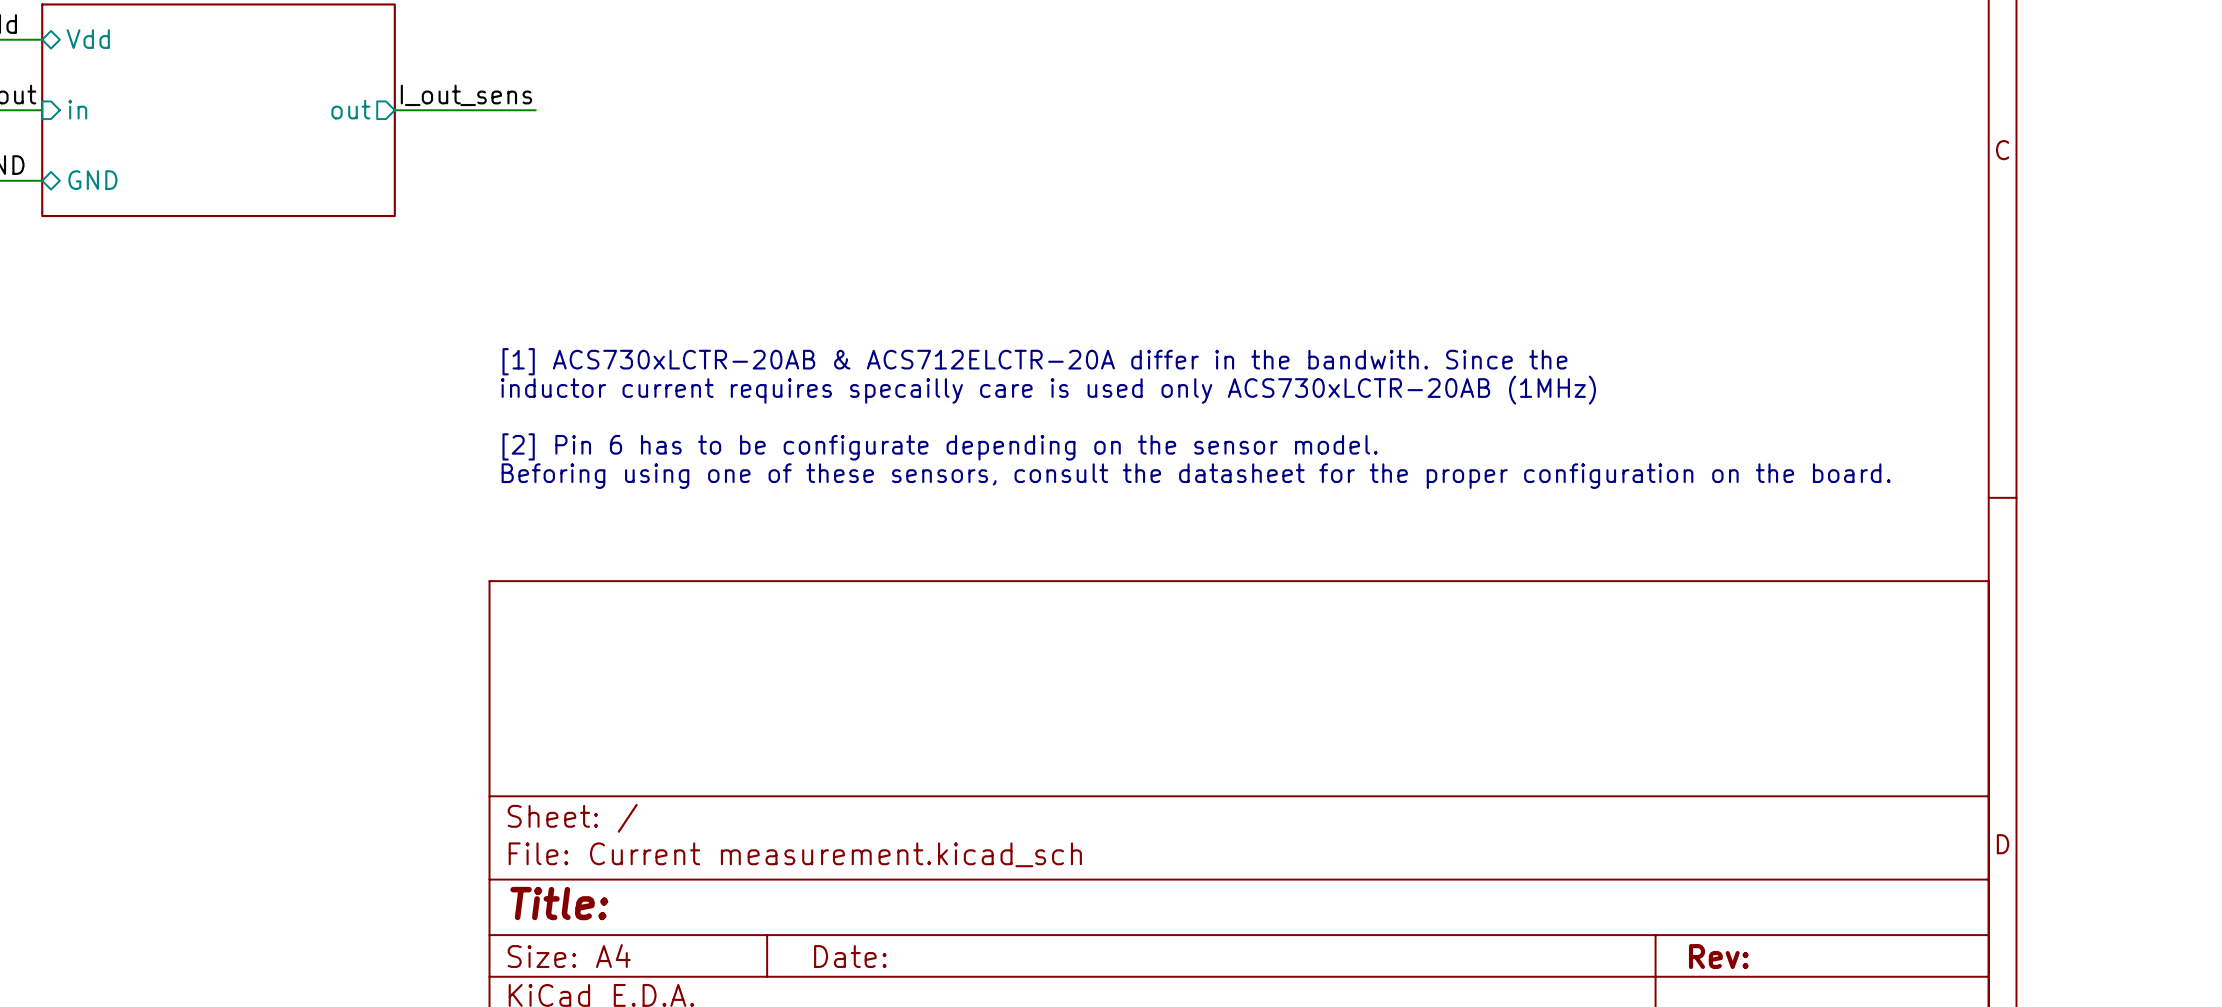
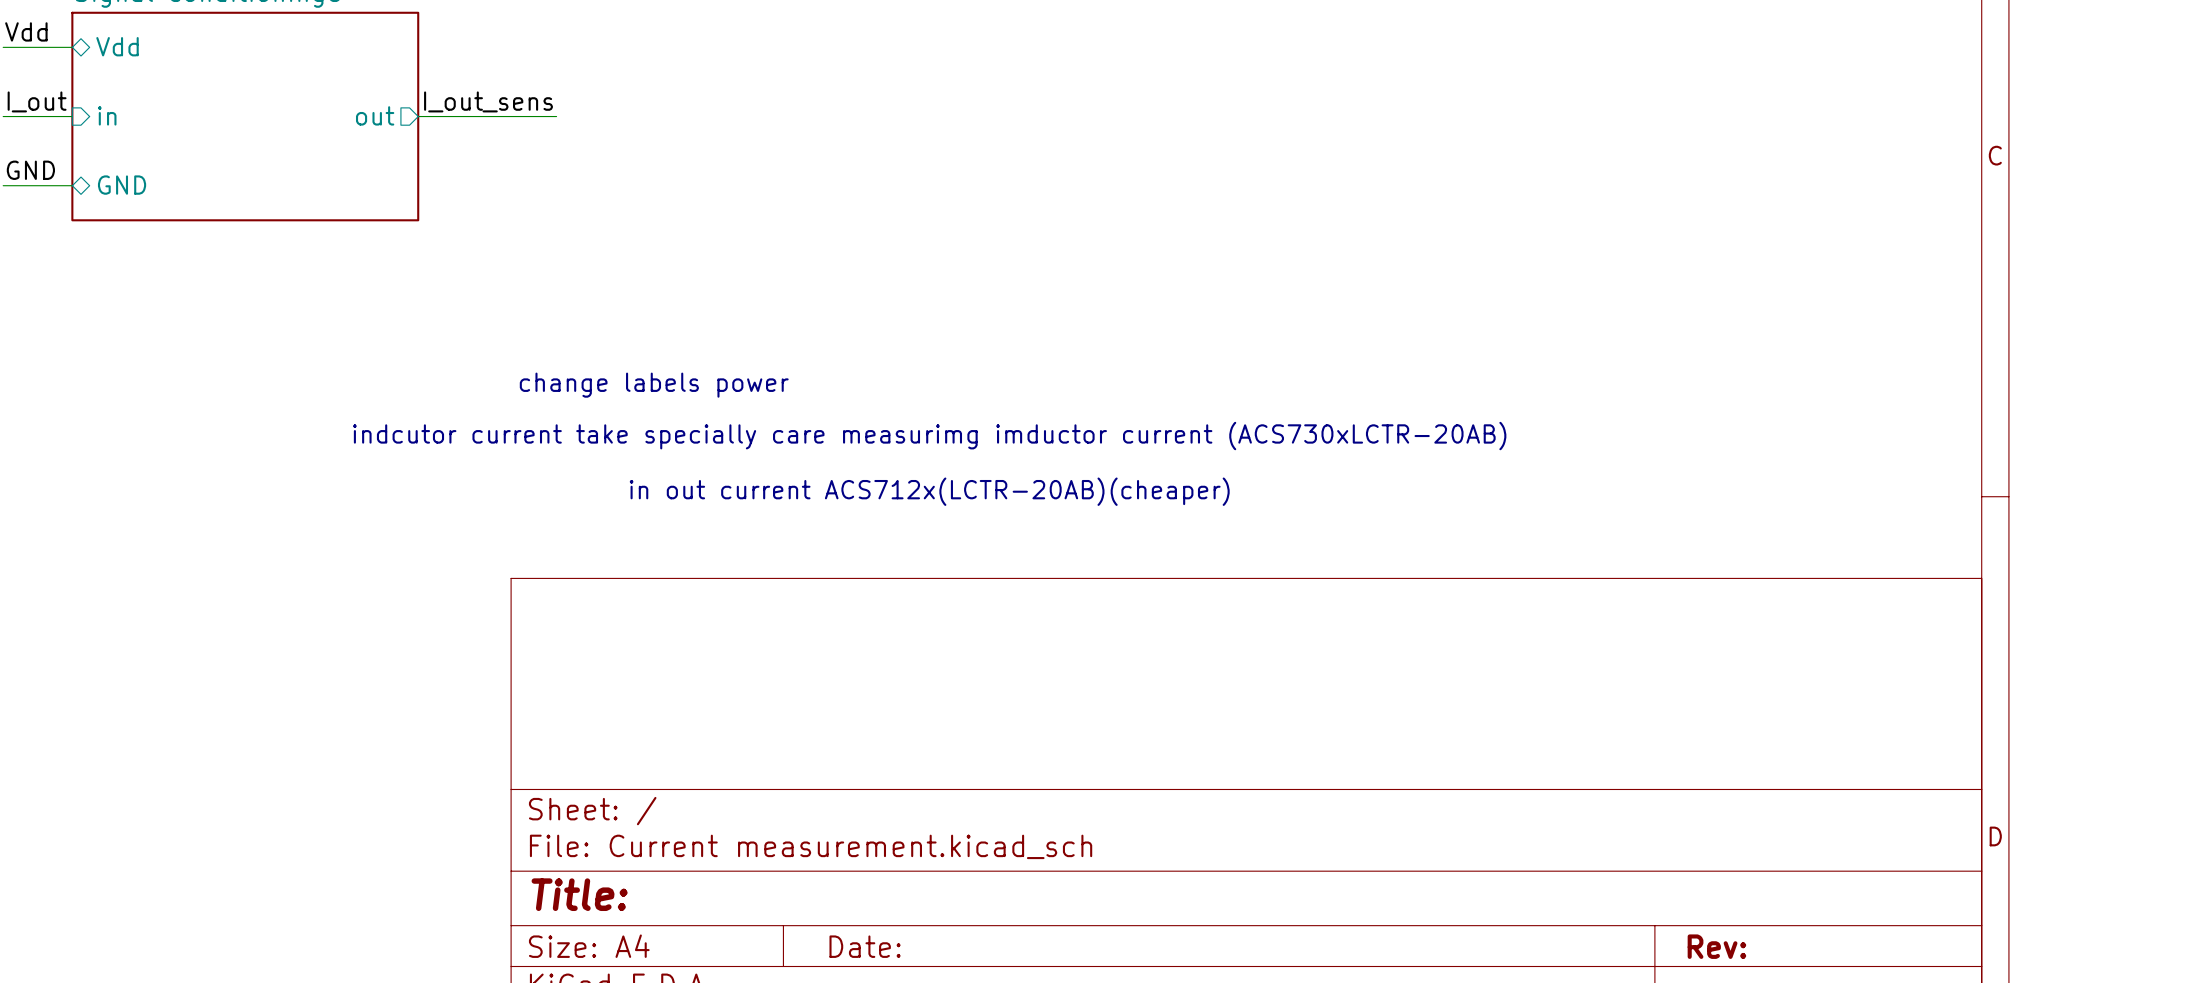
text: [1] ACS730xLCTR-20AB & ACS712ELCTR-20A differ in the bandwith. Since the (1034, 361) -> none
text: none -> change labels power (654, 385)
text: inductor current requires specailly care is used only ACS730xLCTR-20AB (1MHz) (1048, 390) -> none
text: none -> indcutor current take specially care measurimg imductor current (ACS730xLCTR-20AB) (929, 436)
text: [2] Pin 6 has to be configurate depending on the sensor model. (940, 446) -> none
text: Beforing using one of these sensors, consult the datasheet for the proper configuration on the board. (1196, 476) -> none
text: none -> in out current ACS712x(LCTR-20AB)(cheaper) (929, 491)

